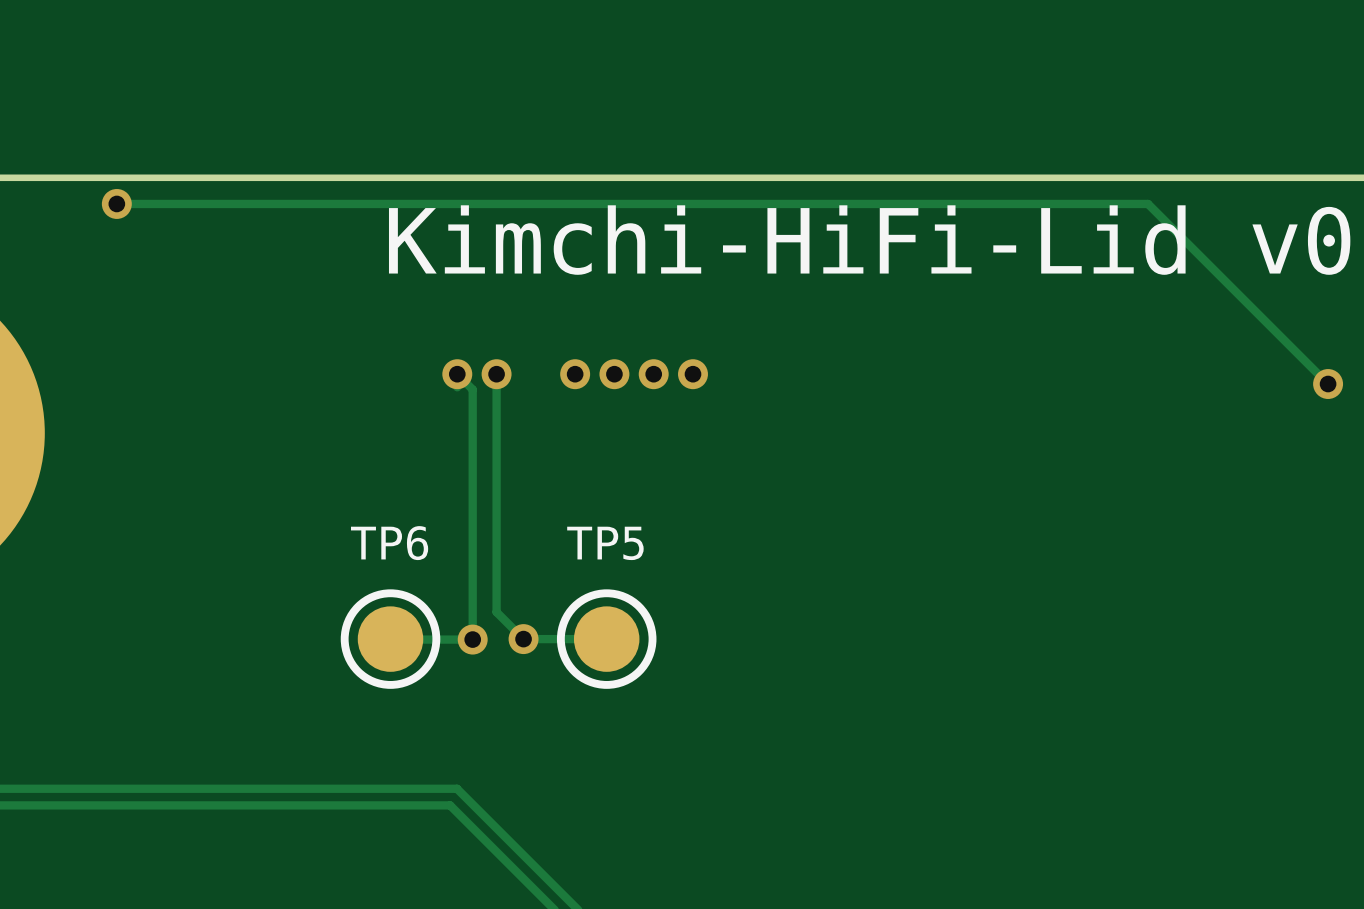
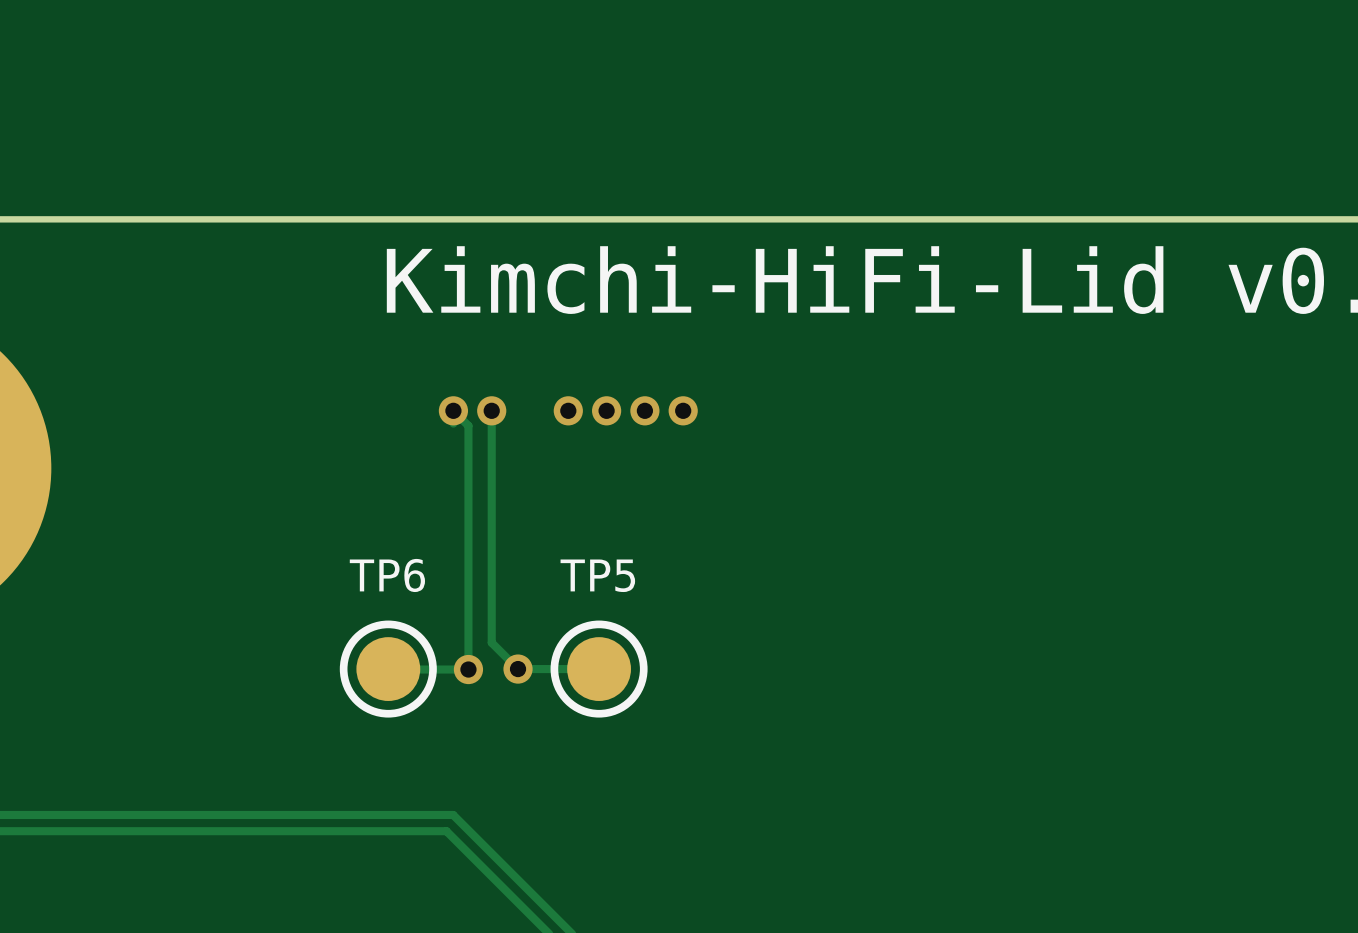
track: (116, 203) (1148, 203) (1328, 384) -> none
via: (116, 203) -> none
via: (1328, 384) -> none

